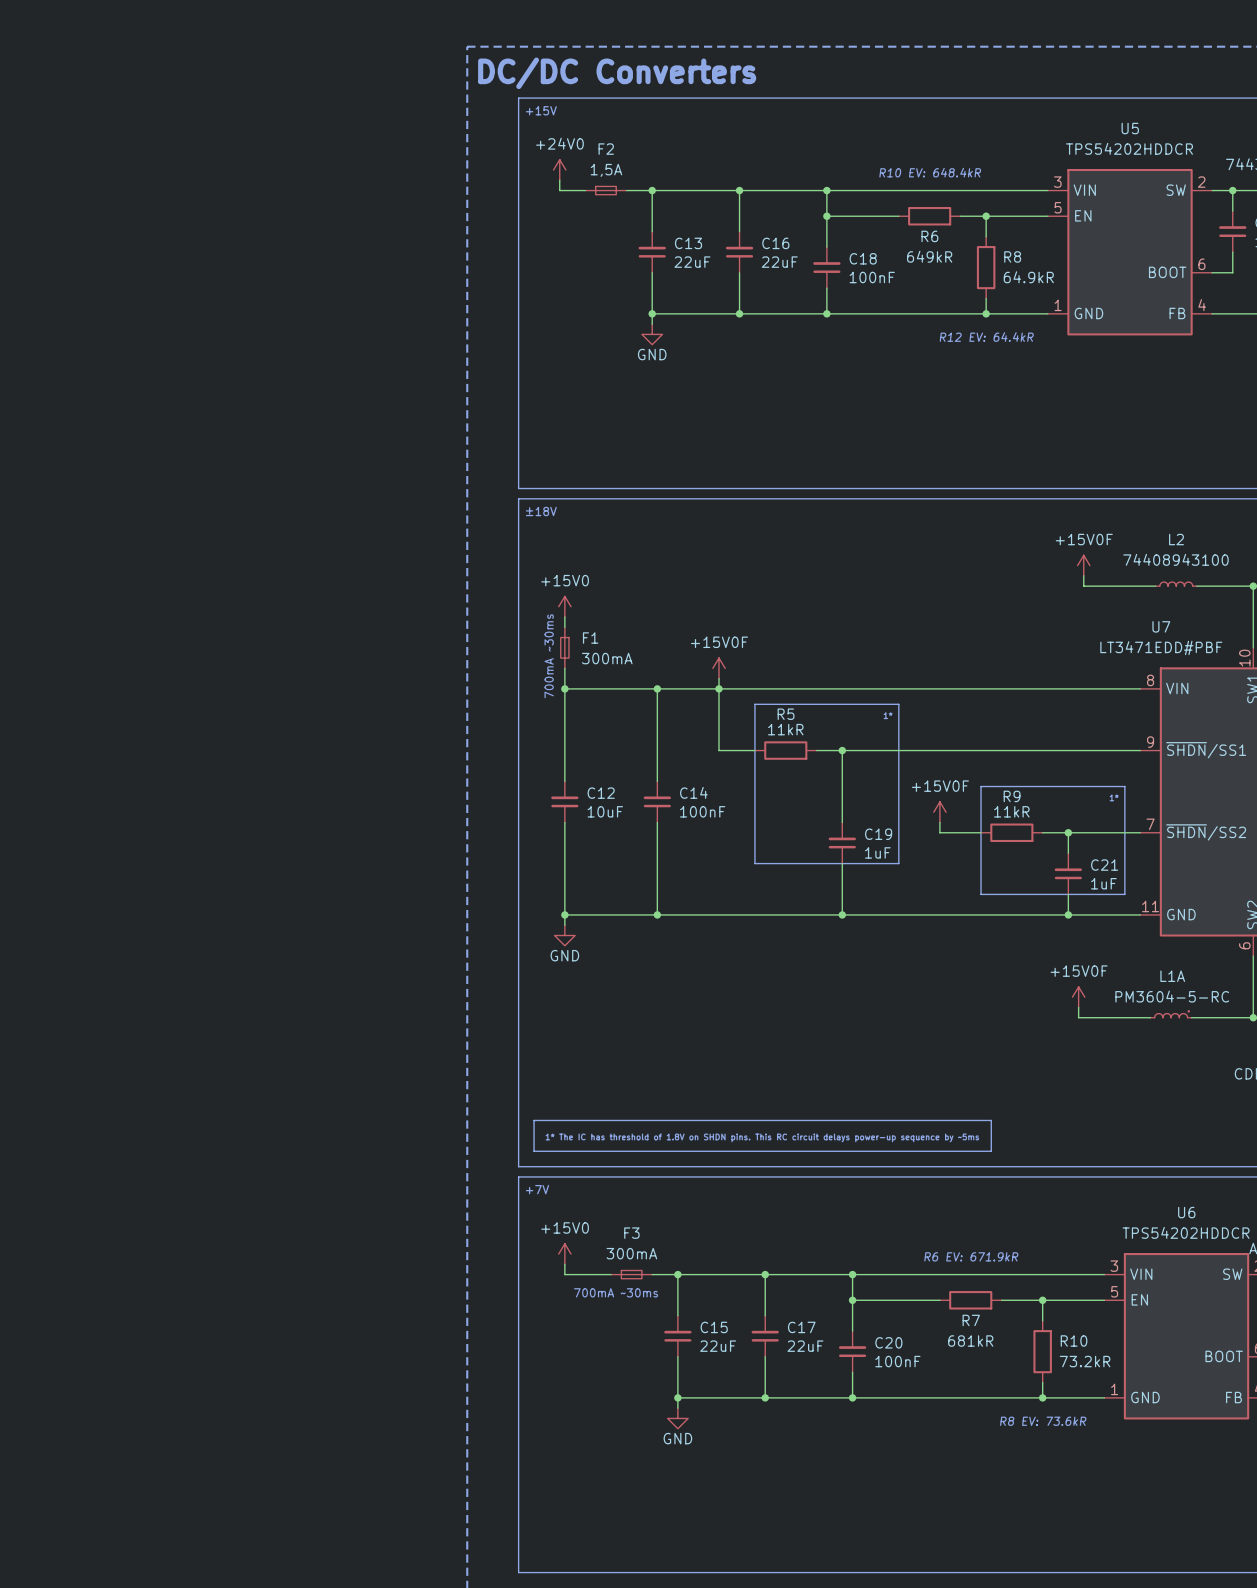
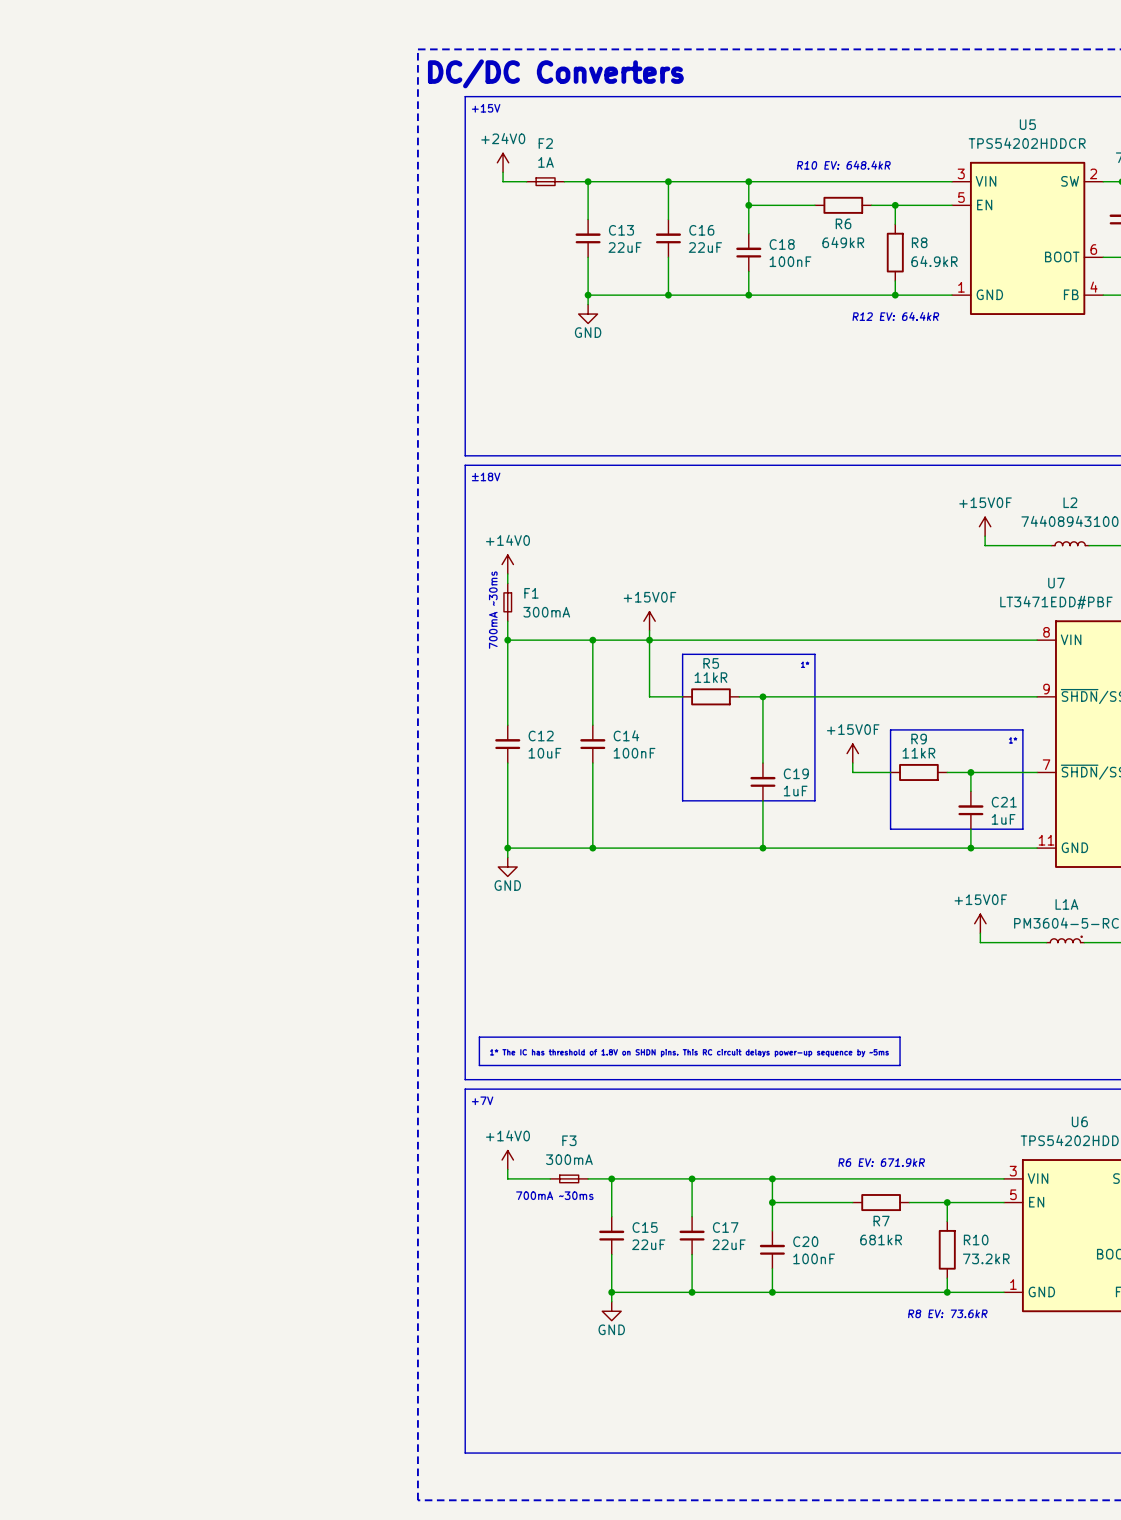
F2 value: 1,5A (606, 170) -> 1A (546, 162)
power symbol: +15V0 (564, 606) -> +14V0 (507, 564)
power symbol: +15V0 (564, 1254) -> +14V0 (507, 1160)

